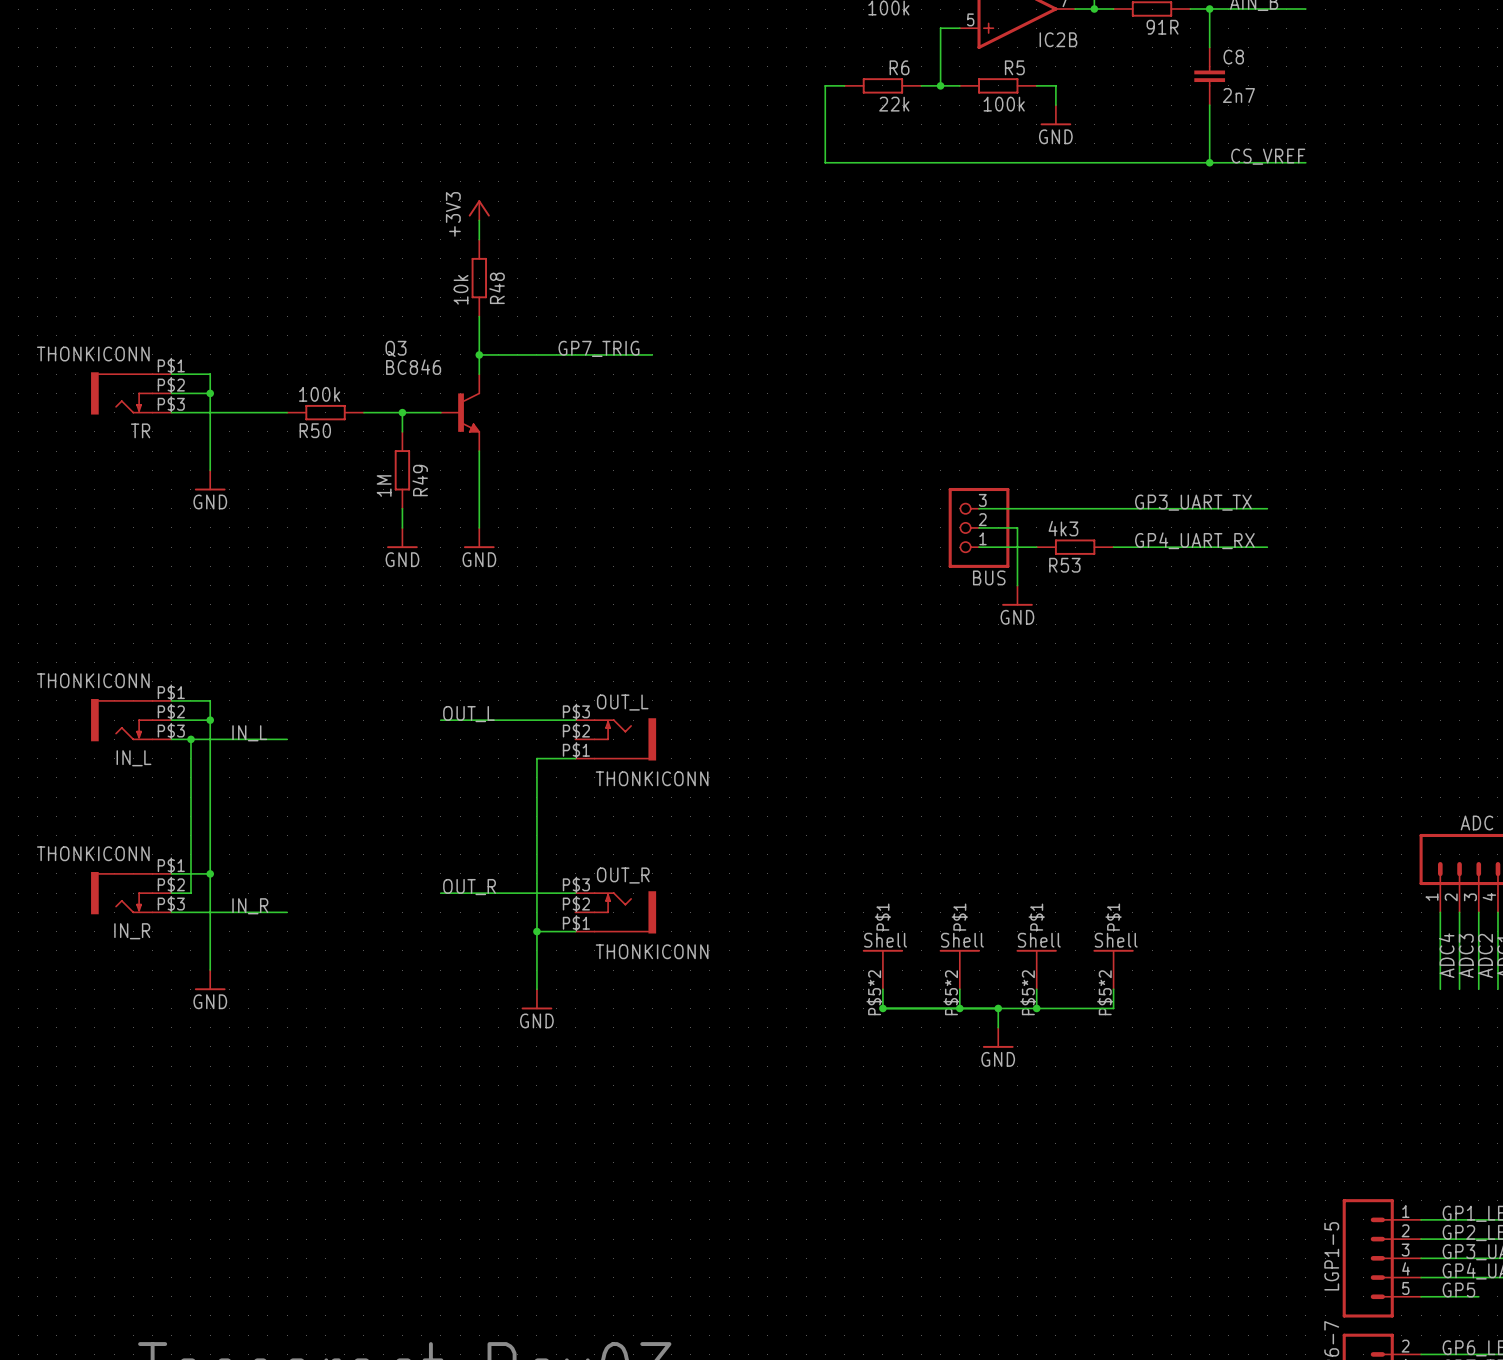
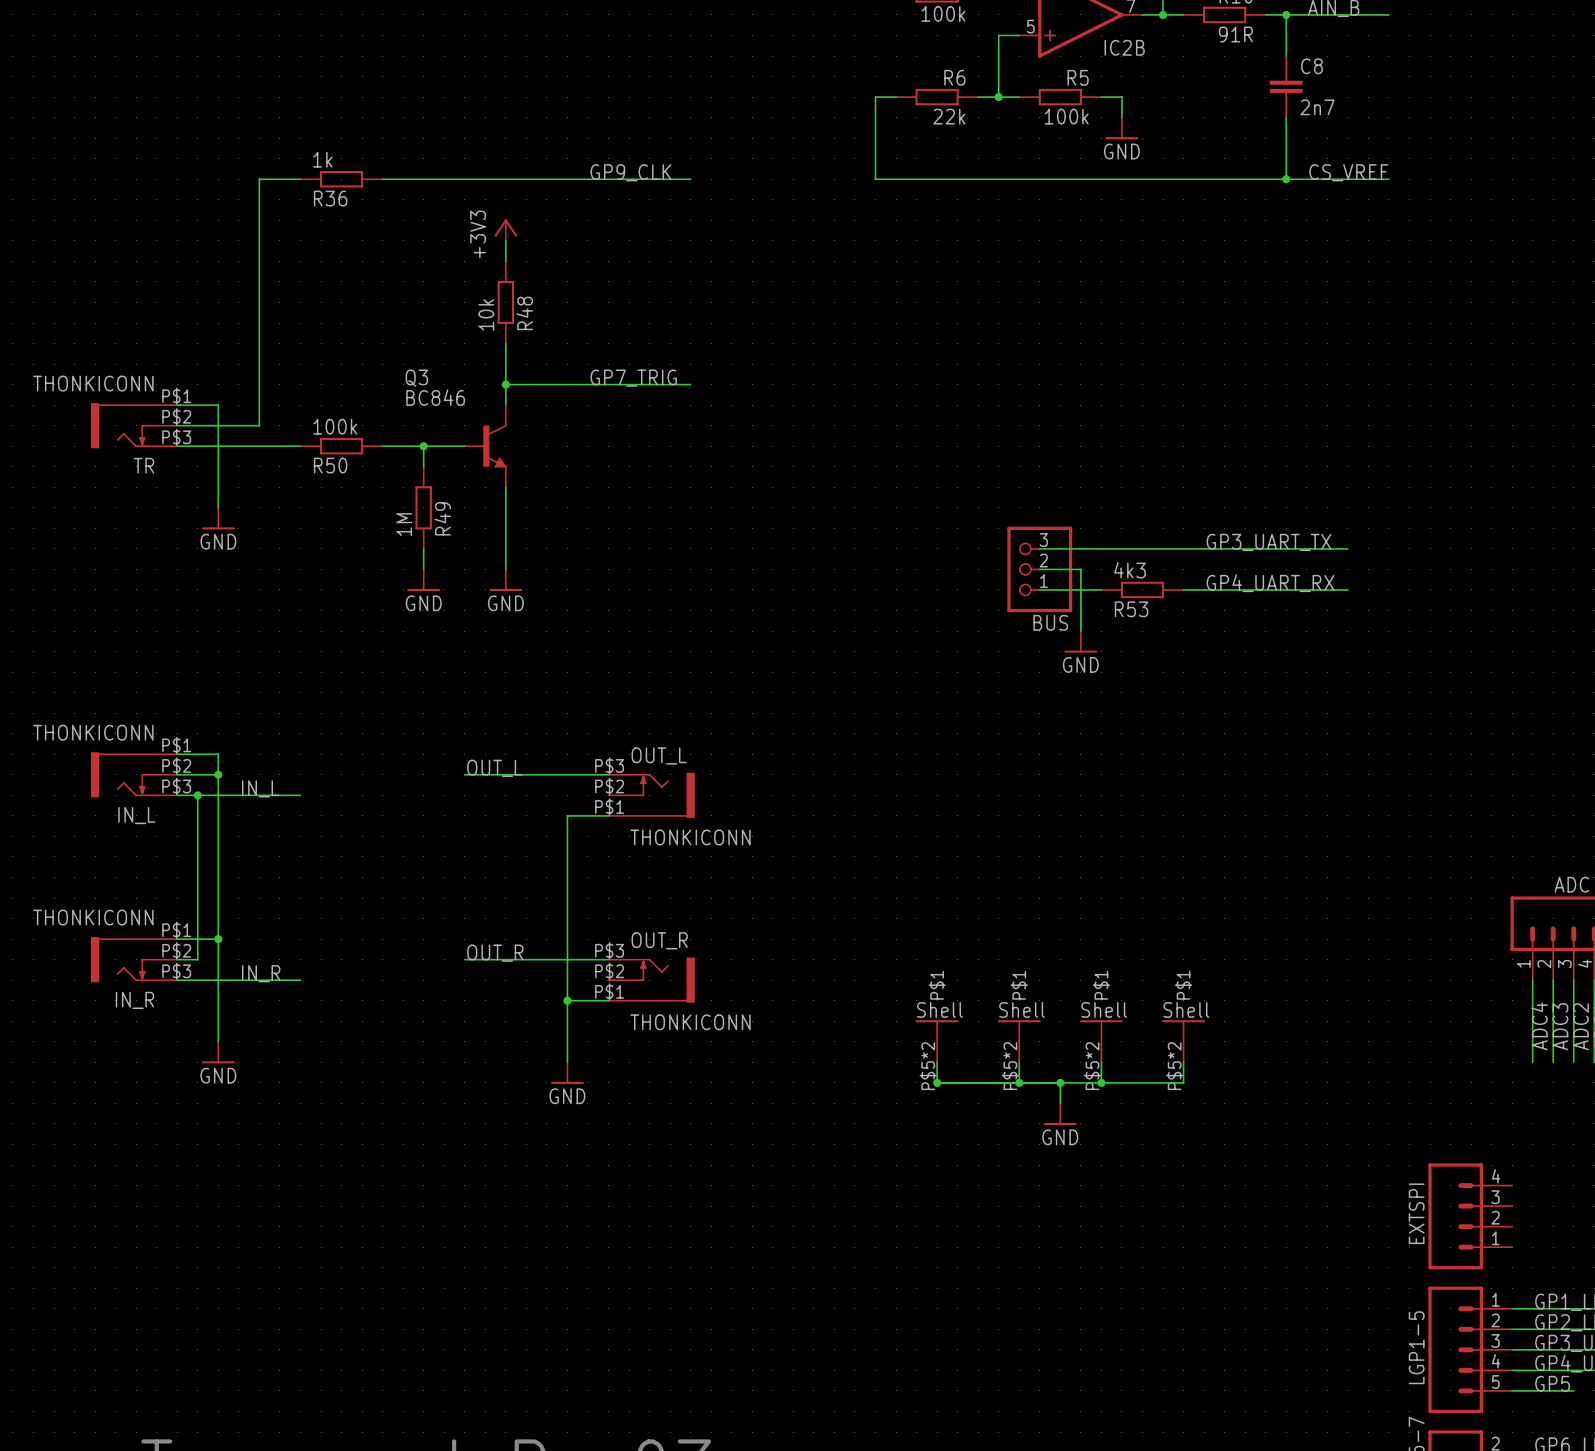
label: none -> GP9_CLK (630, 172)
wire: none -> (300, 179) (259, 179) (259, 425) (218, 425)
R36: none -> 1k (341, 179)
wire: none -> (382, 179) (690, 179)
junction: (210, 393) -> none
EXTSPI: none -> (1470, 1216)

